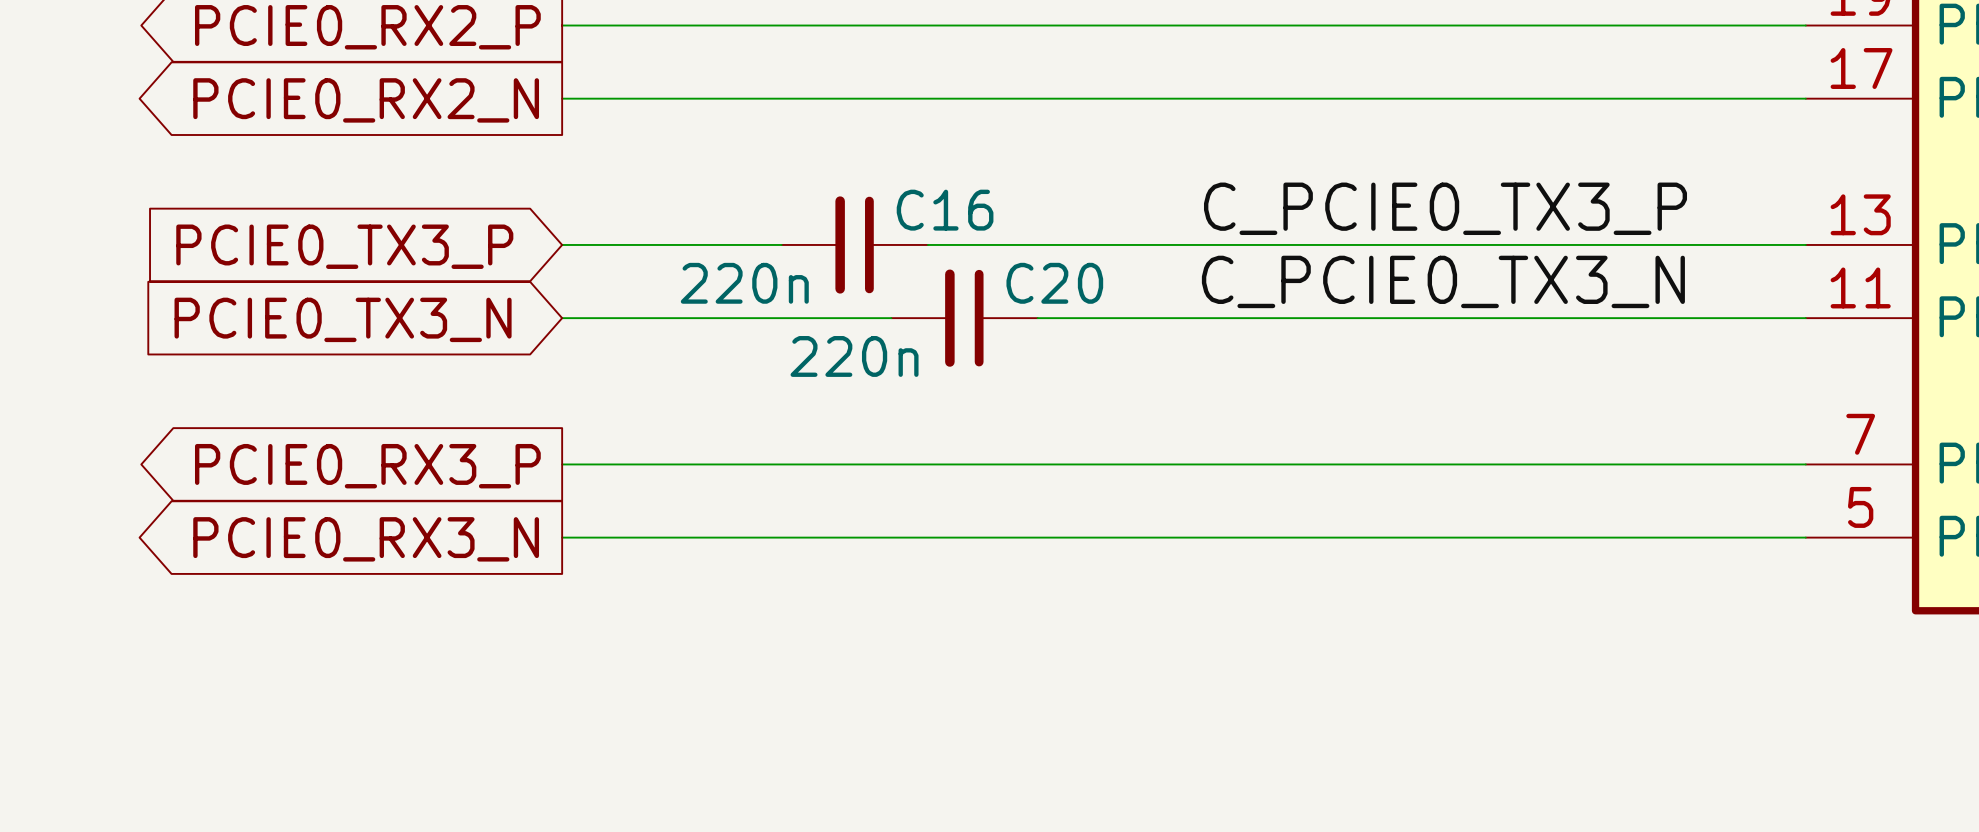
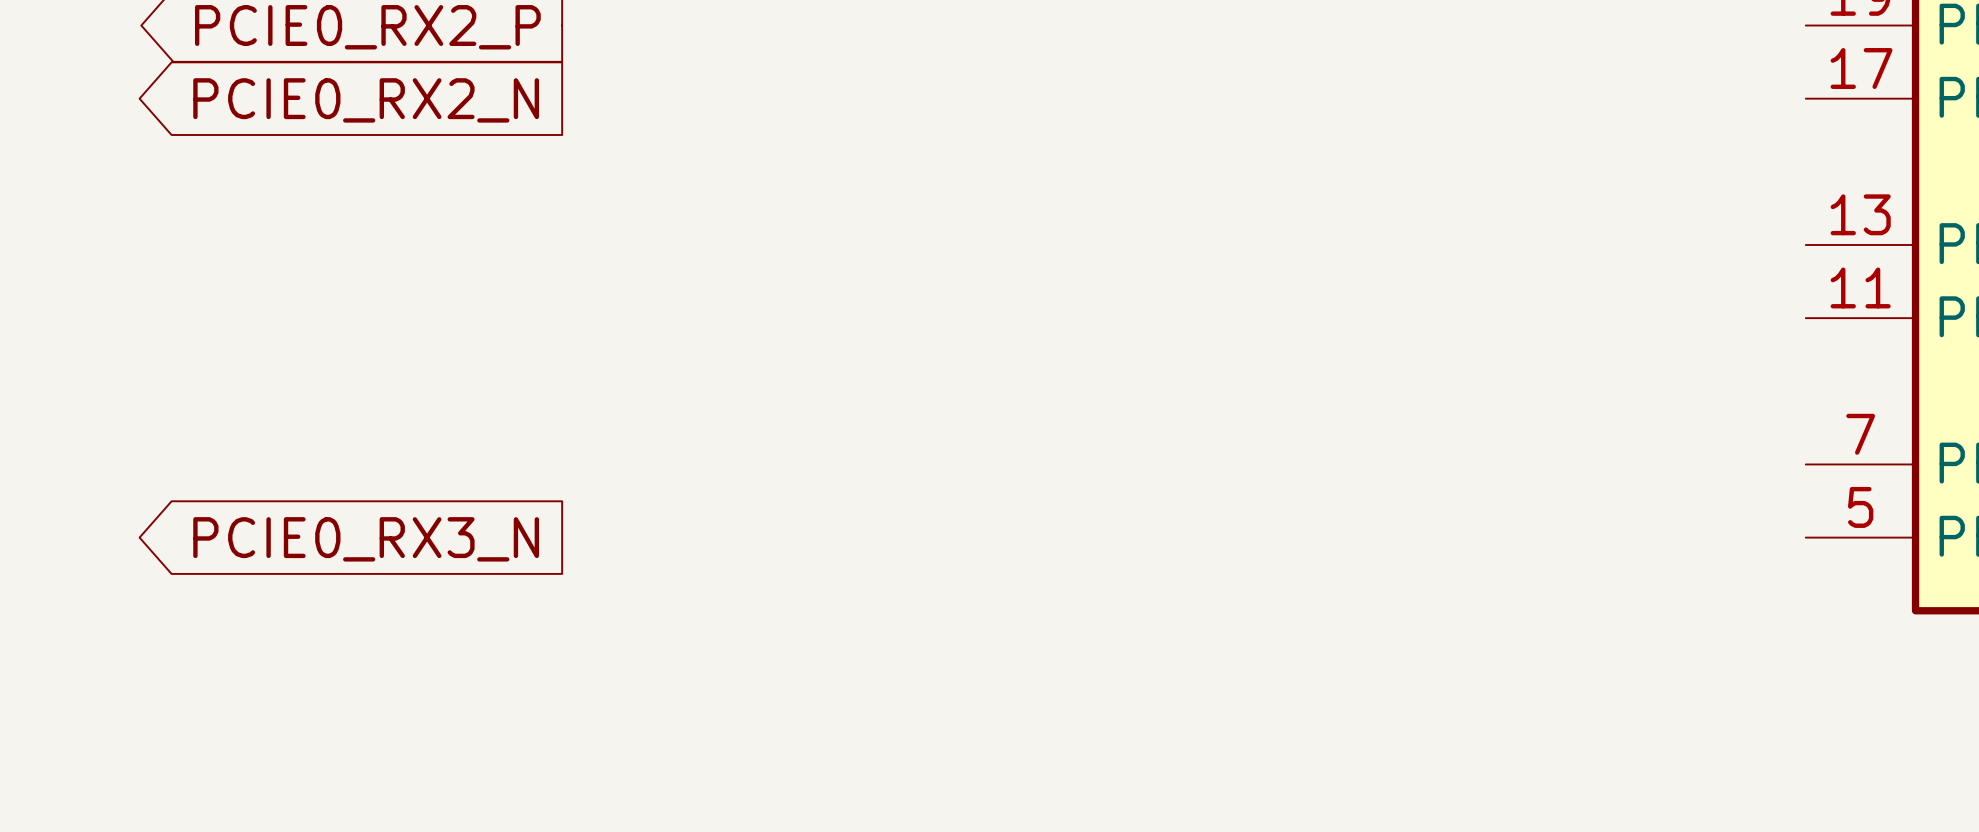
wire: (562, 25) (1805, 25) -> none
wire: (562, 98) (1805, 98) -> none
label: C_PCIE0_TX3_P (1445, 208) -> none
wire: (562, 244) (781, 244) -> none
C16: (854, 244) -> none
wire: (927, 244) (1805, 244) -> none
global label: PCIE0_TX3_P (344, 246) -> none
label: C_PCIE0_TX3_N (1443, 281) -> none
wire: (562, 318) (891, 318) -> none
C20: (964, 318) -> none
wire: (1037, 318) (1805, 318) -> none
global label: PCIE0_TX3_N (343, 319) -> none
wire: (562, 464) (1805, 464) -> none
global label: PCIE0_RX3_P (367, 466) -> none
wire: (562, 537) (1805, 537) -> none

